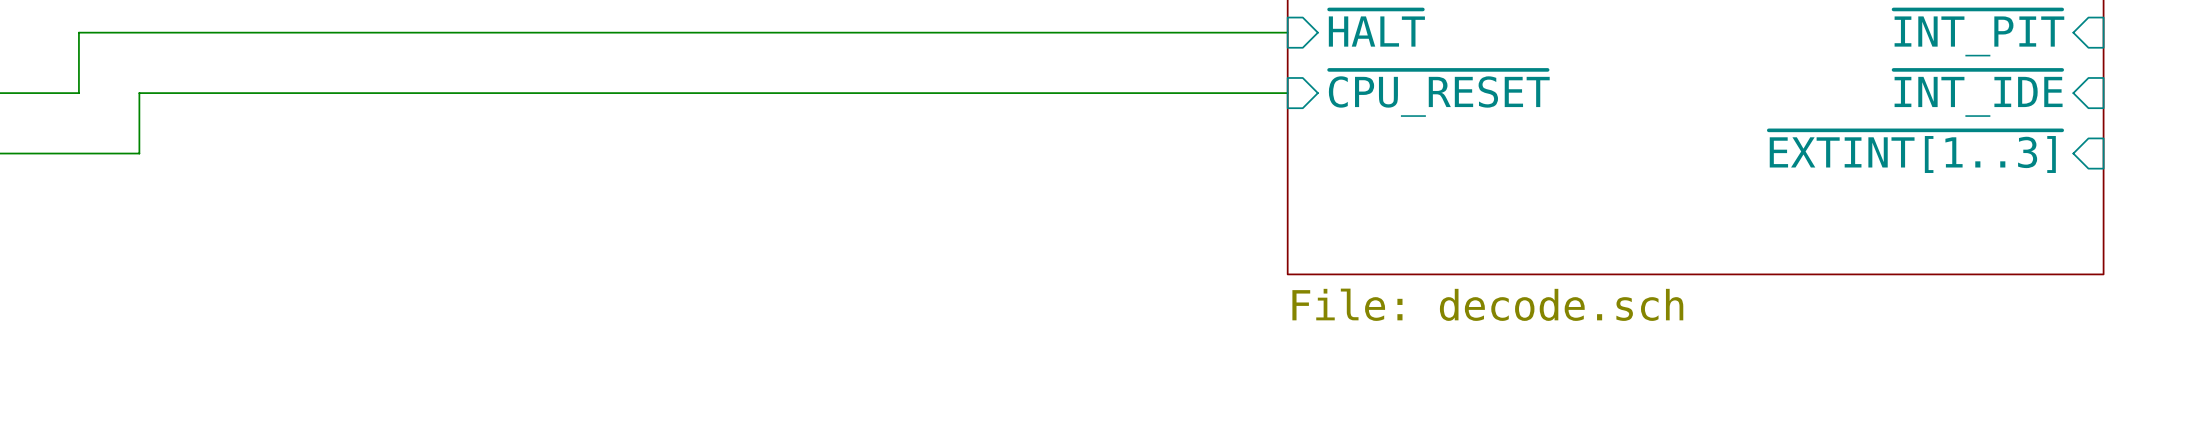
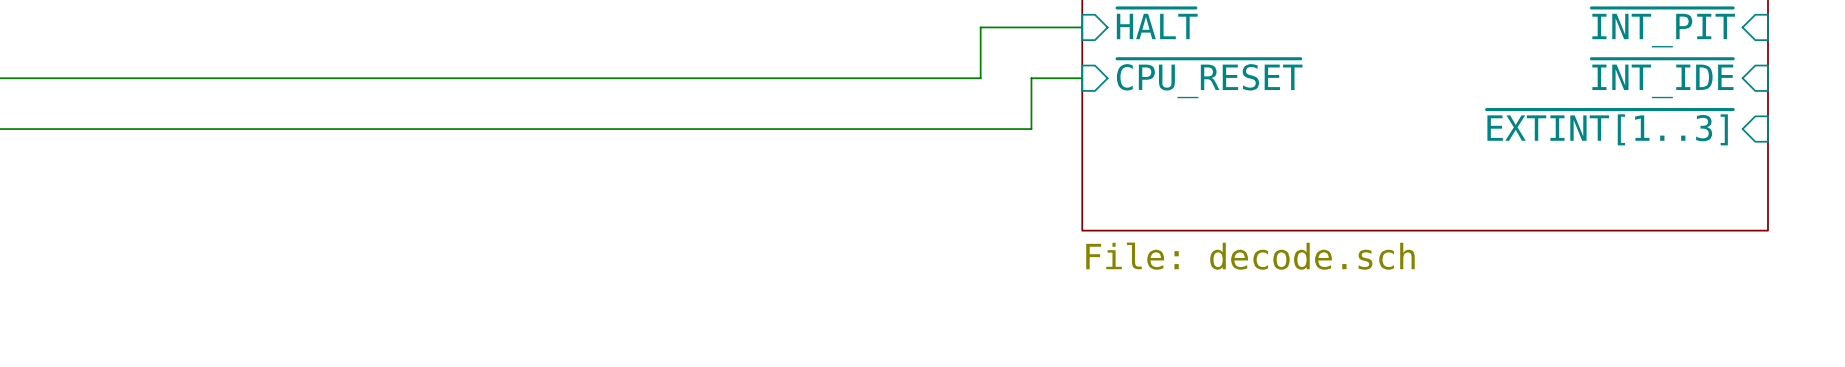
wire: (1166, 32) (78, 32) (78, 93) -> none
wire: (139, 93) (139, 153) -> (117, 78) (66, 78)
wire: (1166, 93) (1227, 93) -> (980, 78) (980, 27)
wire: none -> (1031, 78) (1031, 129) (117, 129)

